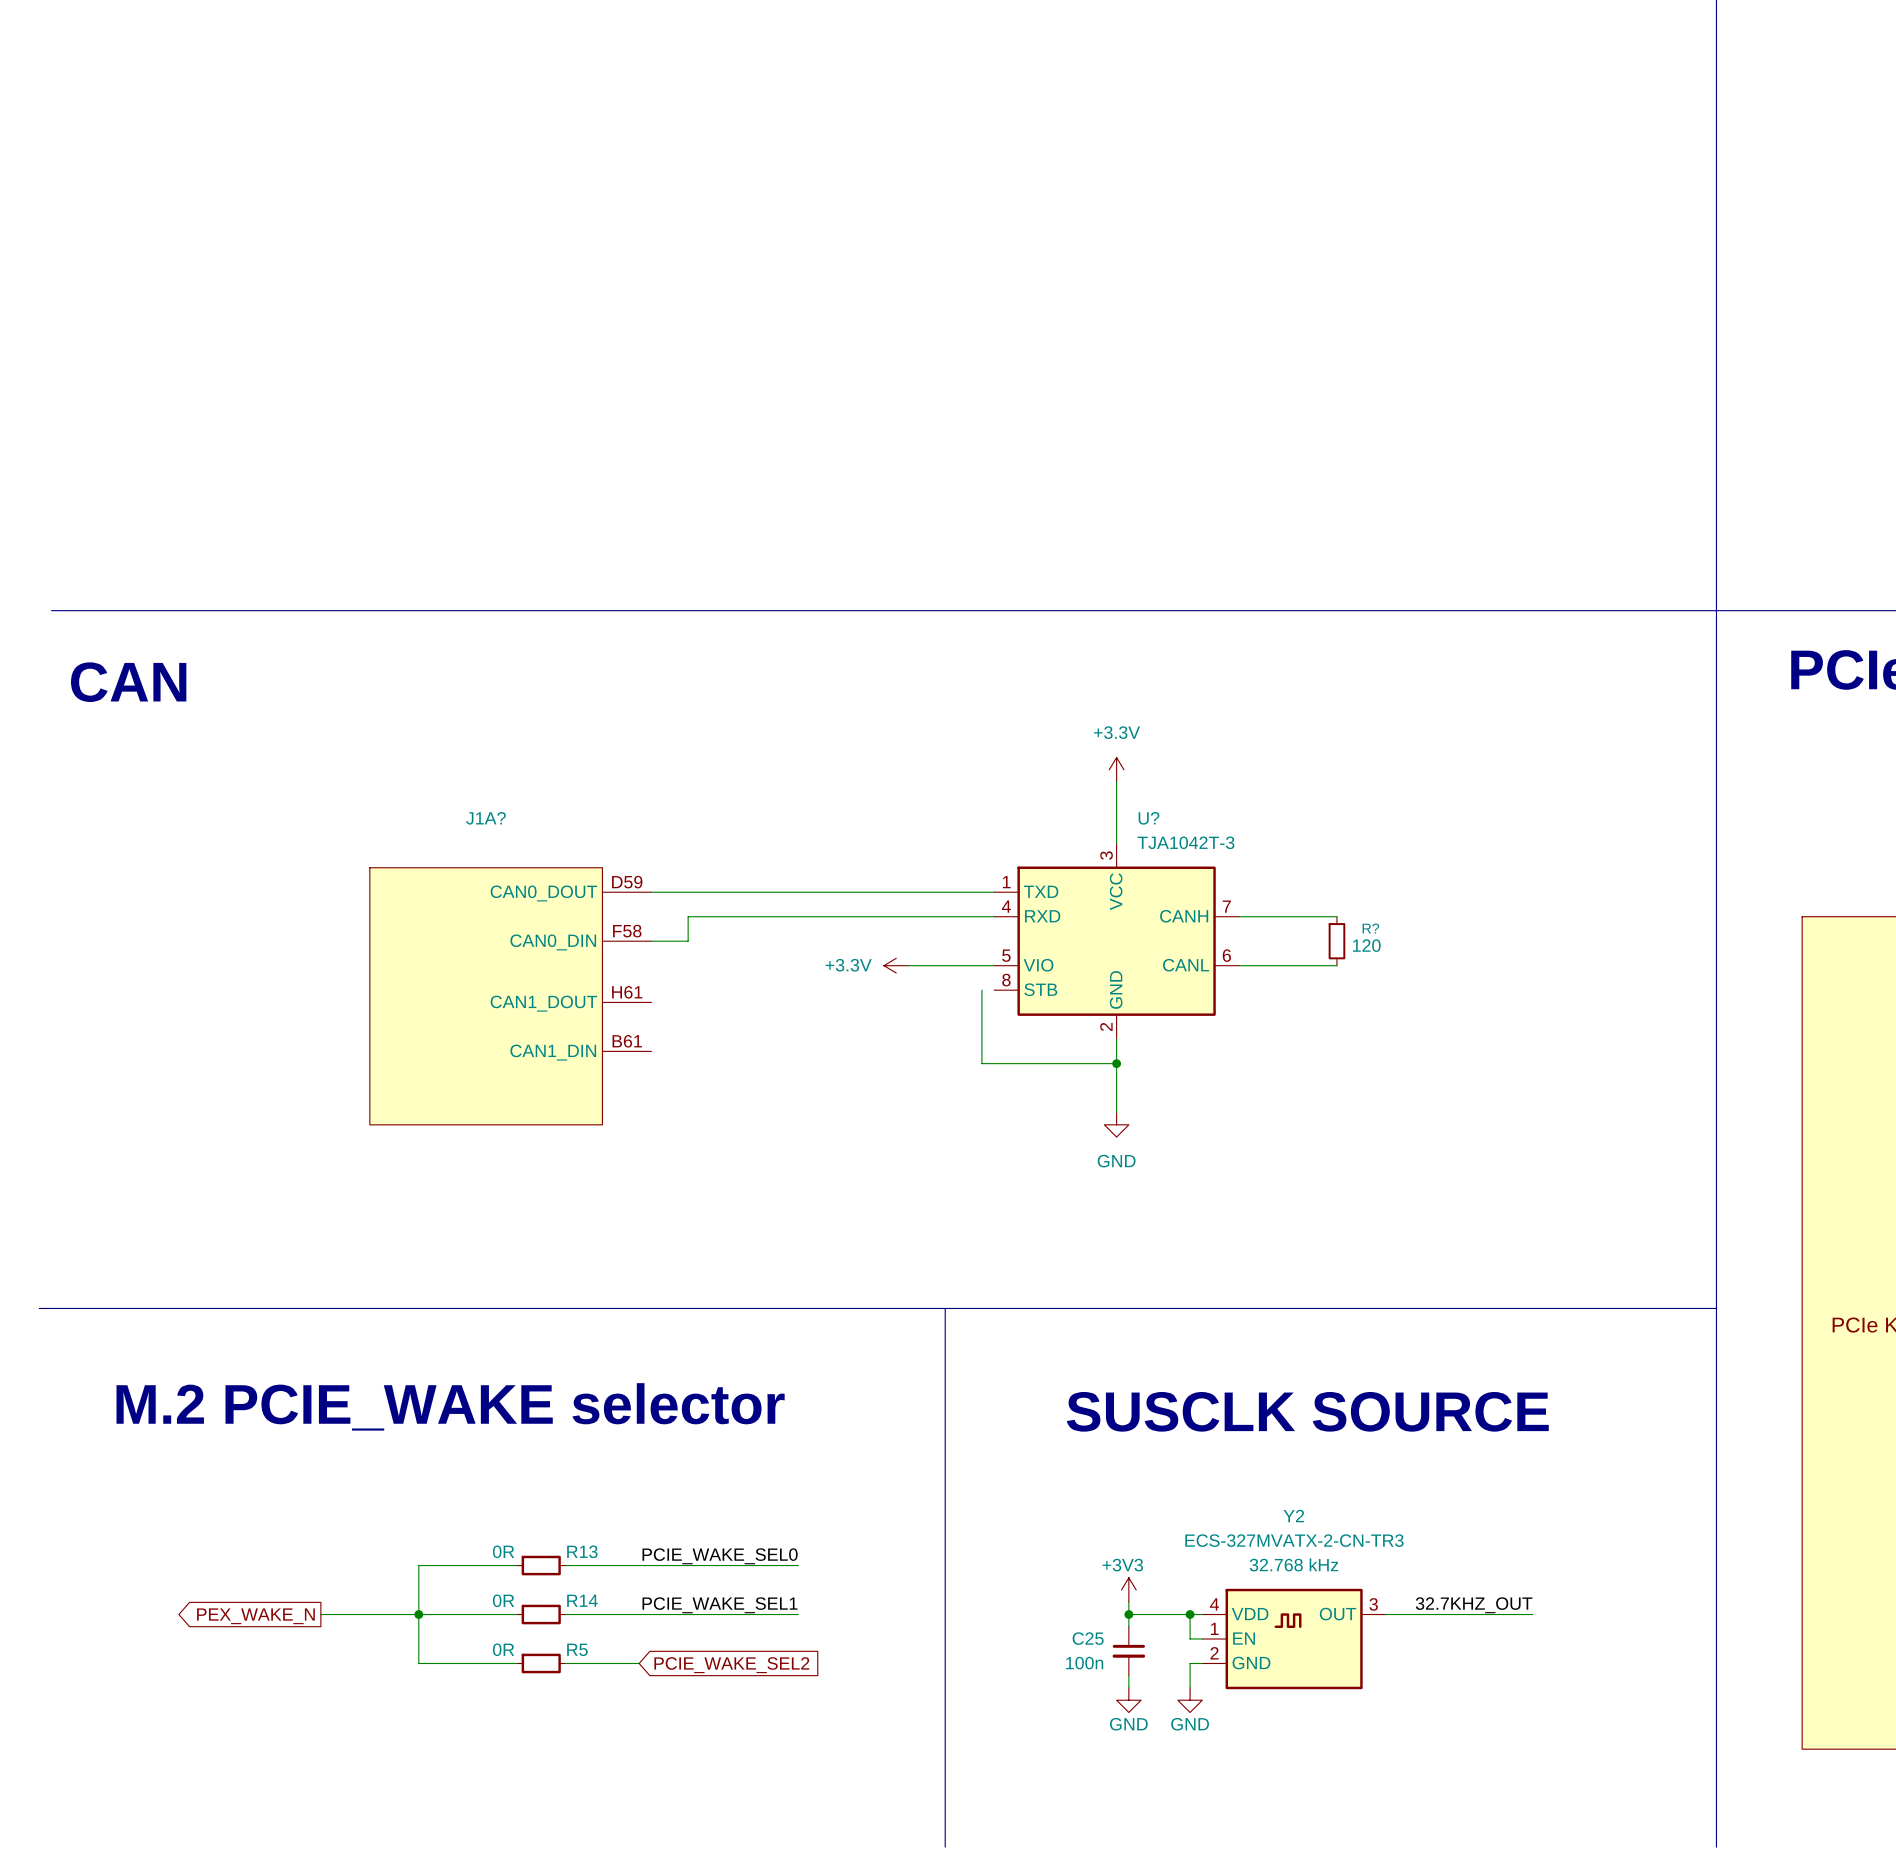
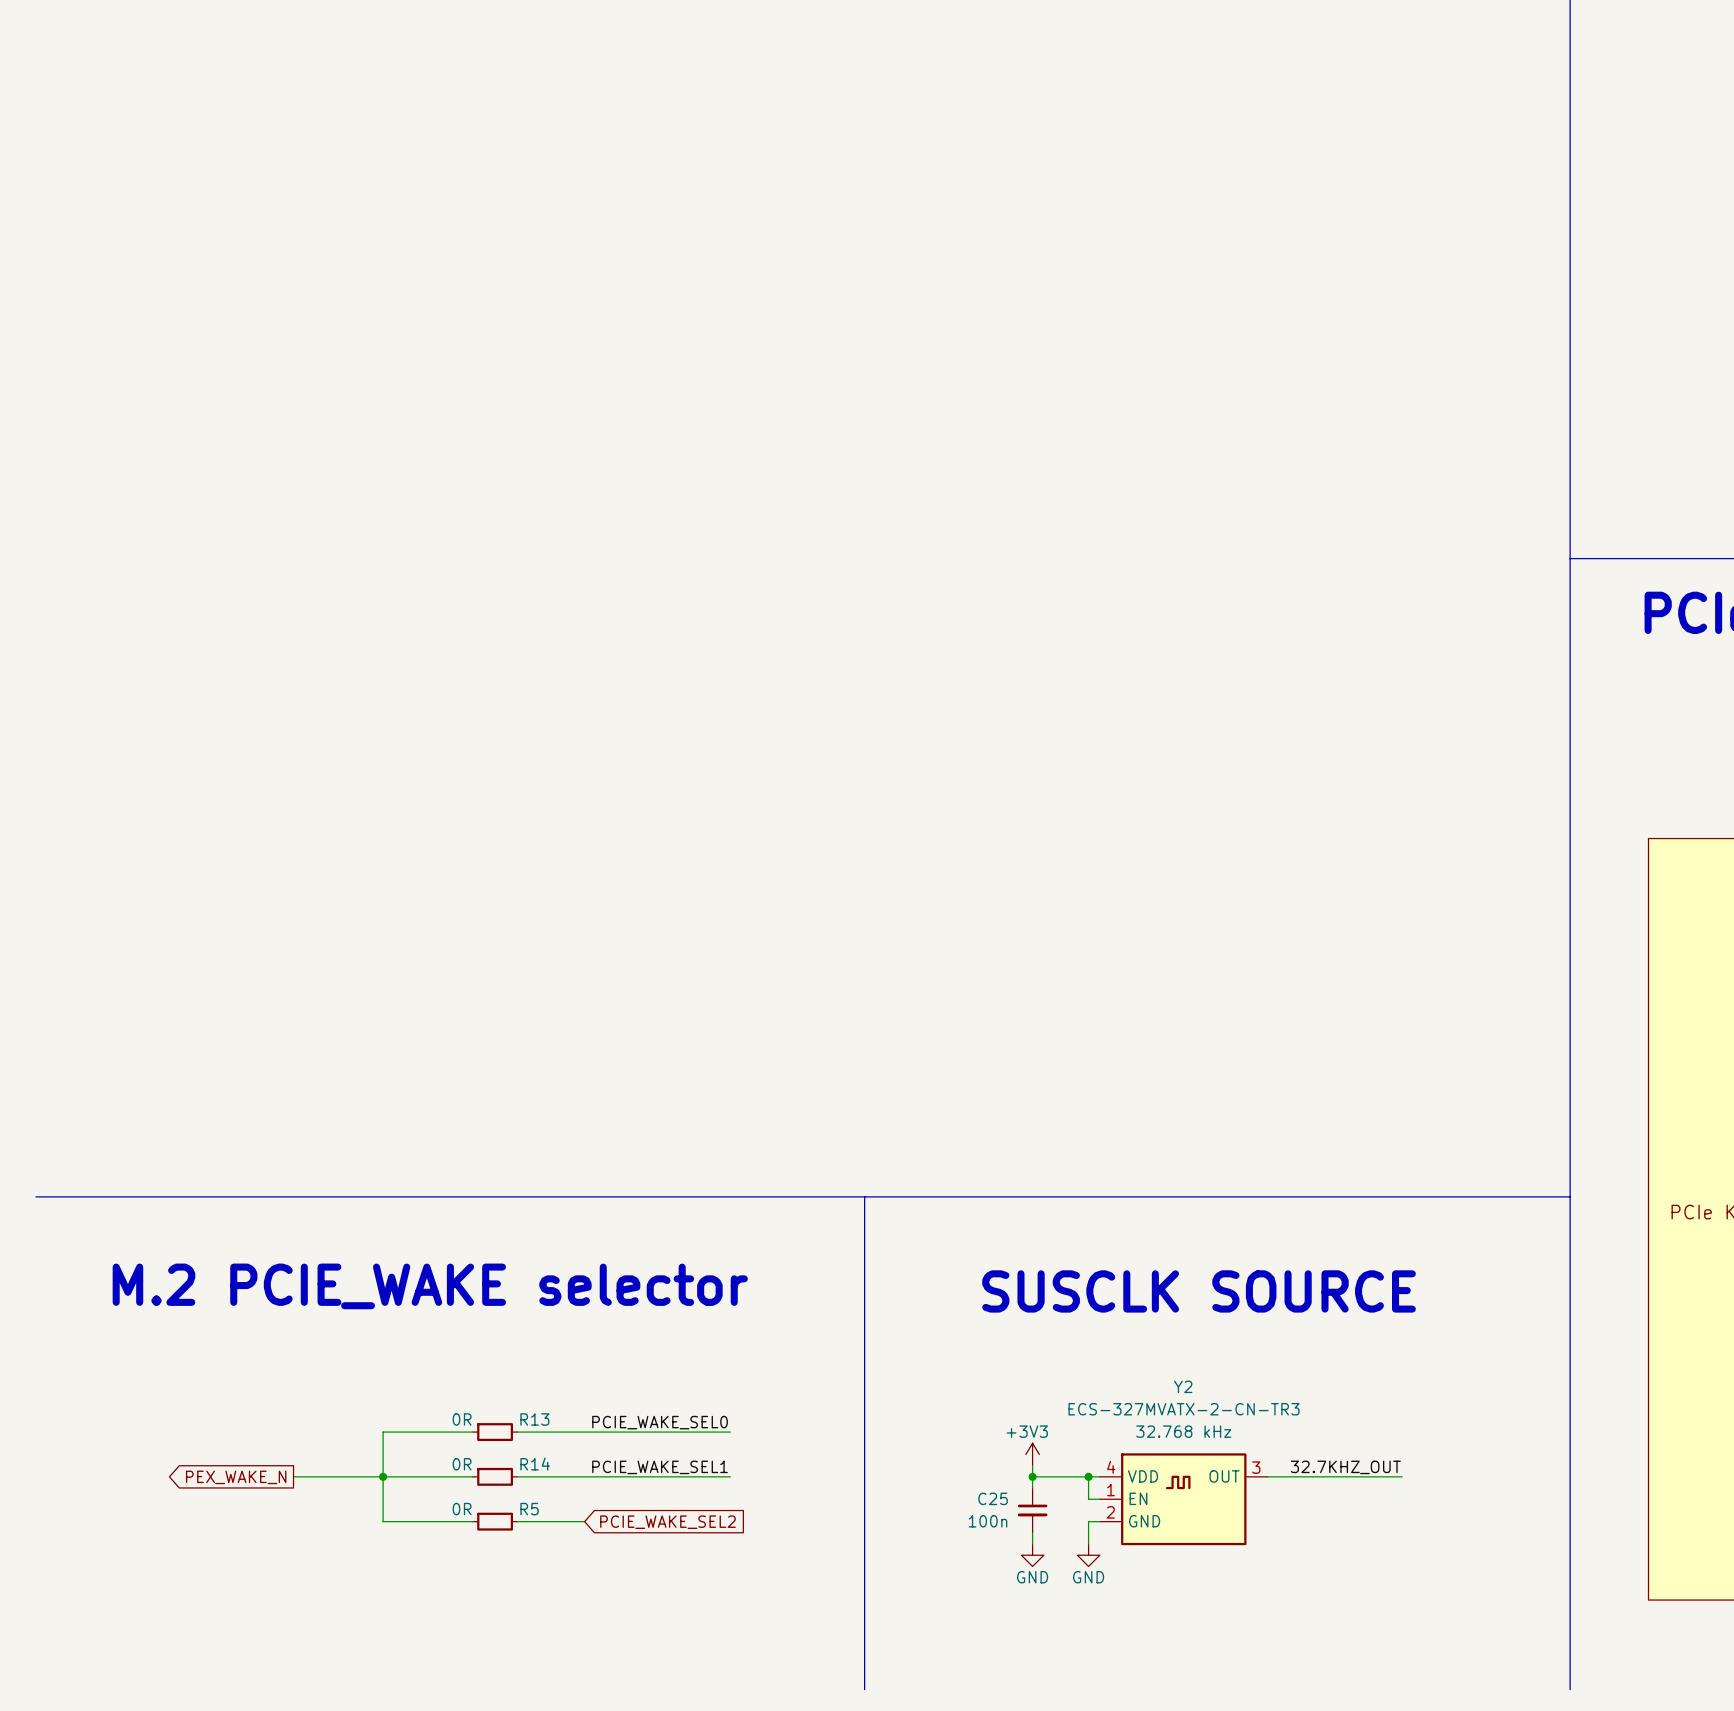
line: (51, 610) (1716, 610) -> none
text: CAN (128, 682) -> none
power symbol: +3.3V (1116, 769) -> none
wire: (1116, 782) (1116, 843) -> none
wire: (651, 892) (994, 892) -> none
wire: (994, 916) (688, 916) (688, 941) (651, 941) -> none
wire: (1239, 916) (1336, 916) -> none
U?: TJA1042T-3 (1116, 941) -> none
R?: 120 (1336, 941) -> none
power symbol: +3.3V (896, 965) -> none
wire: (908, 965) (994, 965) -> none
wire: (1239, 965) (1336, 965) -> none
wire: (981, 990) (981, 1063) (1116, 1063) -> none
J1A?: (510, 996) -> none
wire: (1116, 1039) (1116, 1112) -> none
junction: (1116, 1063) -> none
power symbol: GND (1116, 1124) -> none

